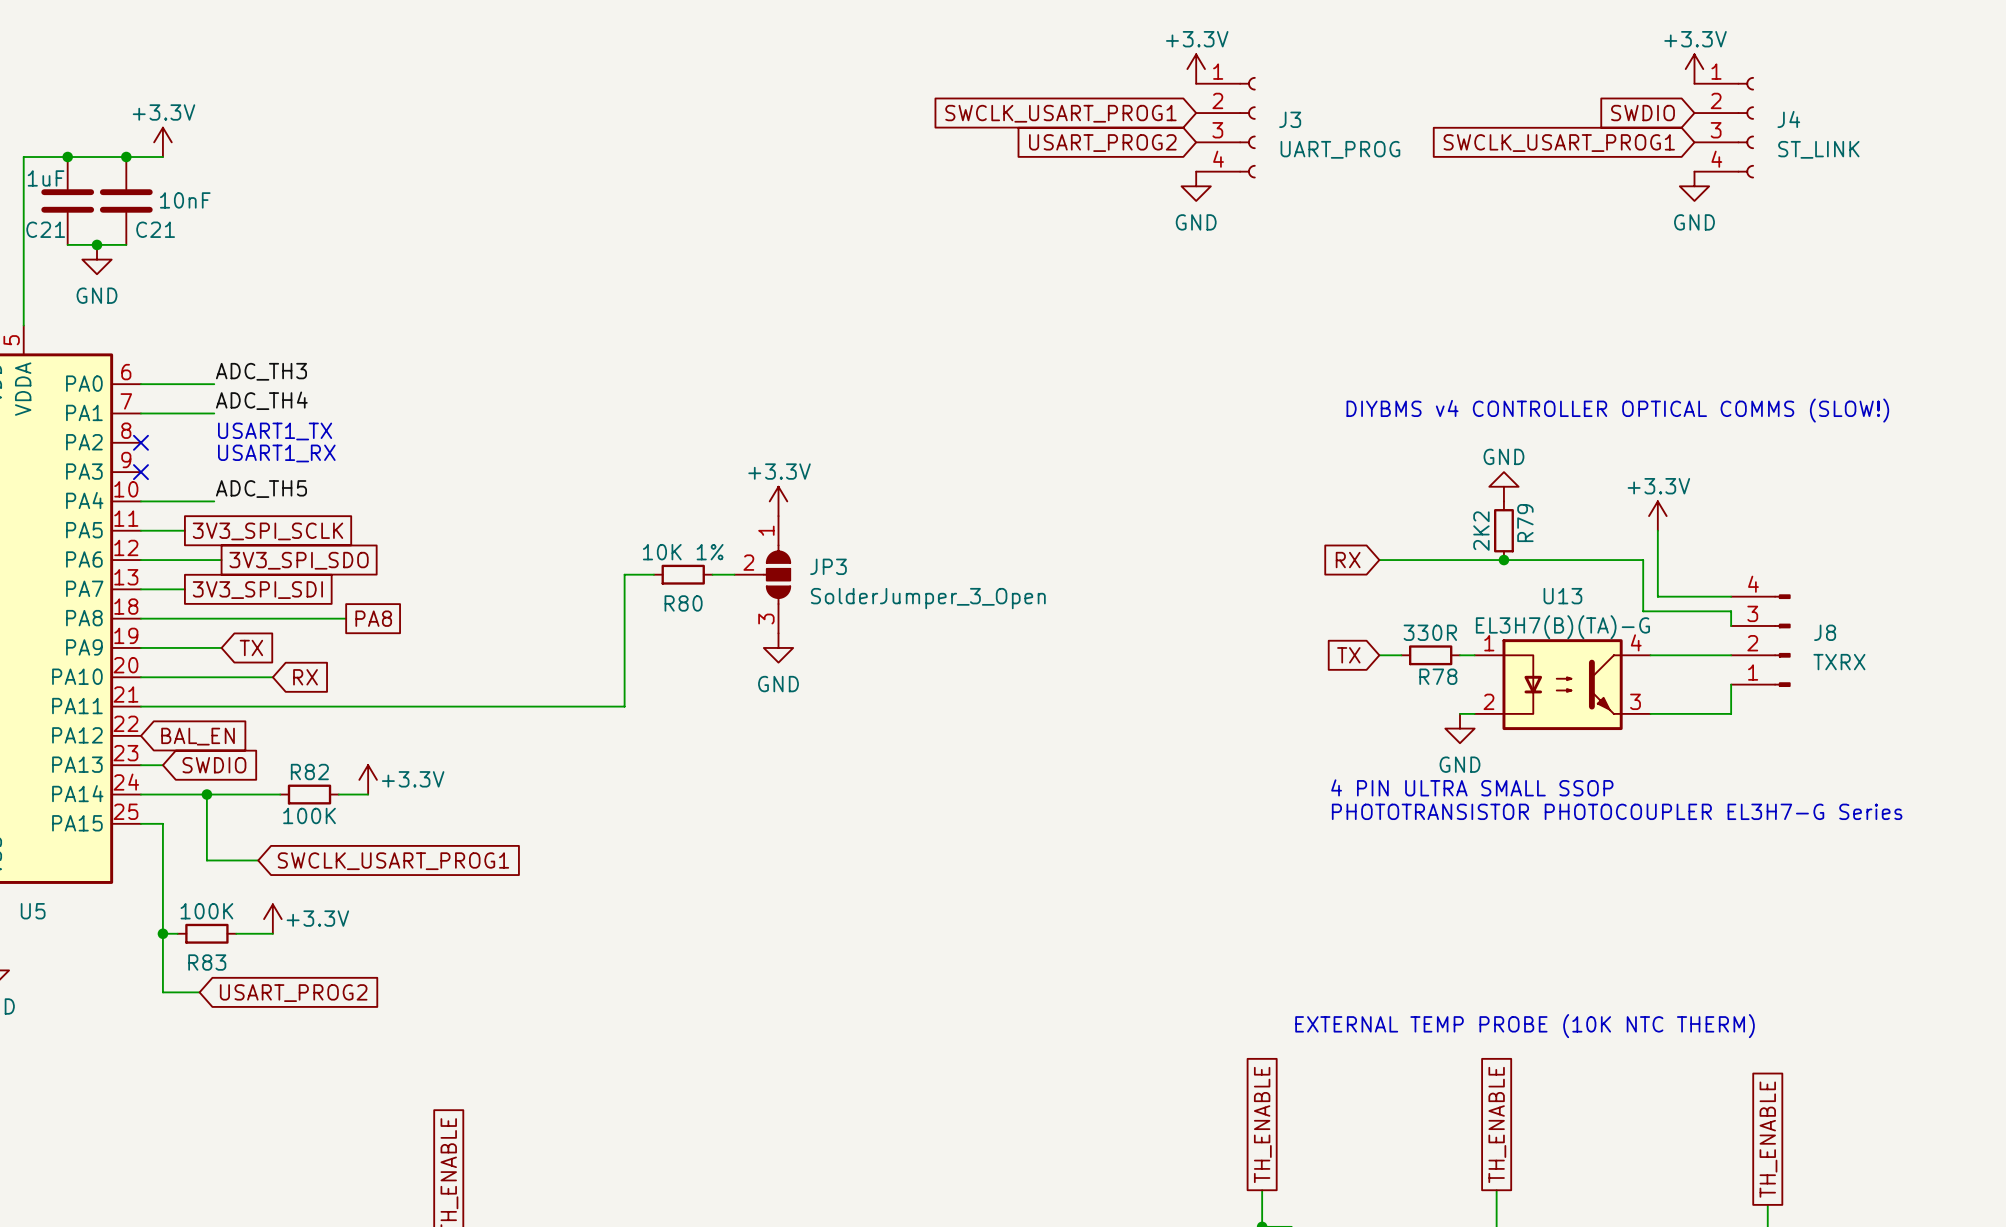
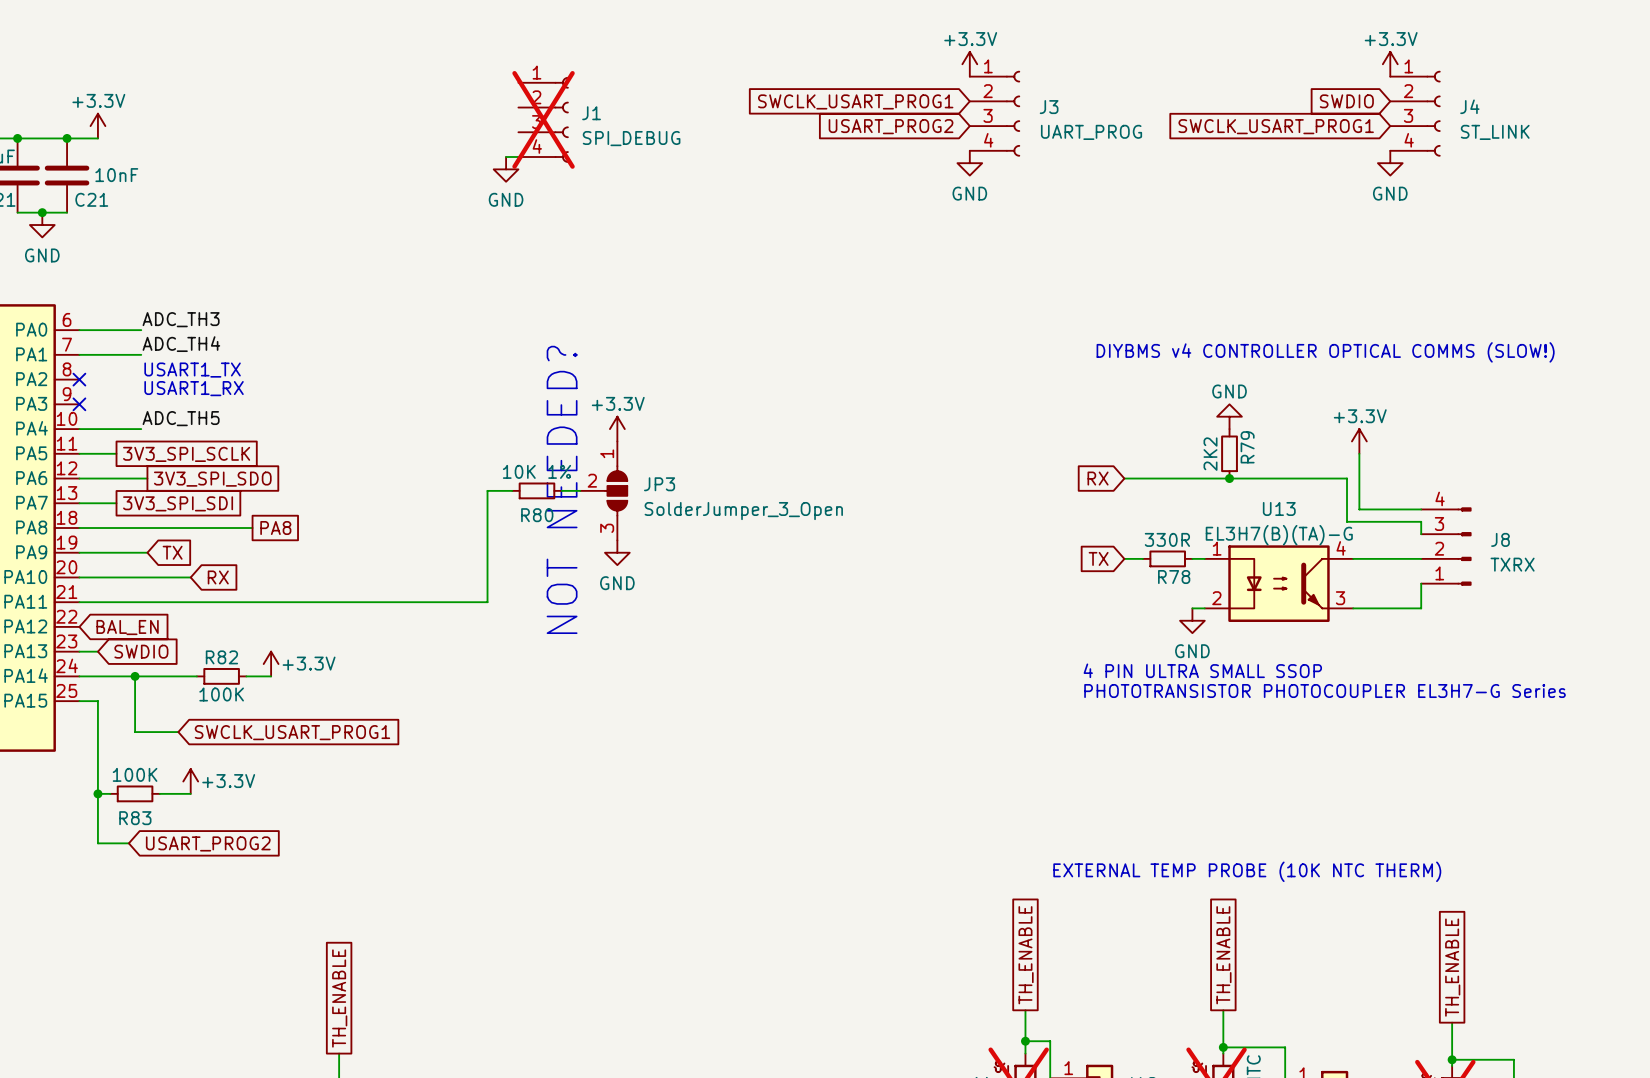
J1: none -> SPI_DEBUG (543, 119)
wire: none -> (506, 157) (518, 157)
power symbol: none -> GND (506, 169)
text: none -> NOT NEEDED? (562, 489)

